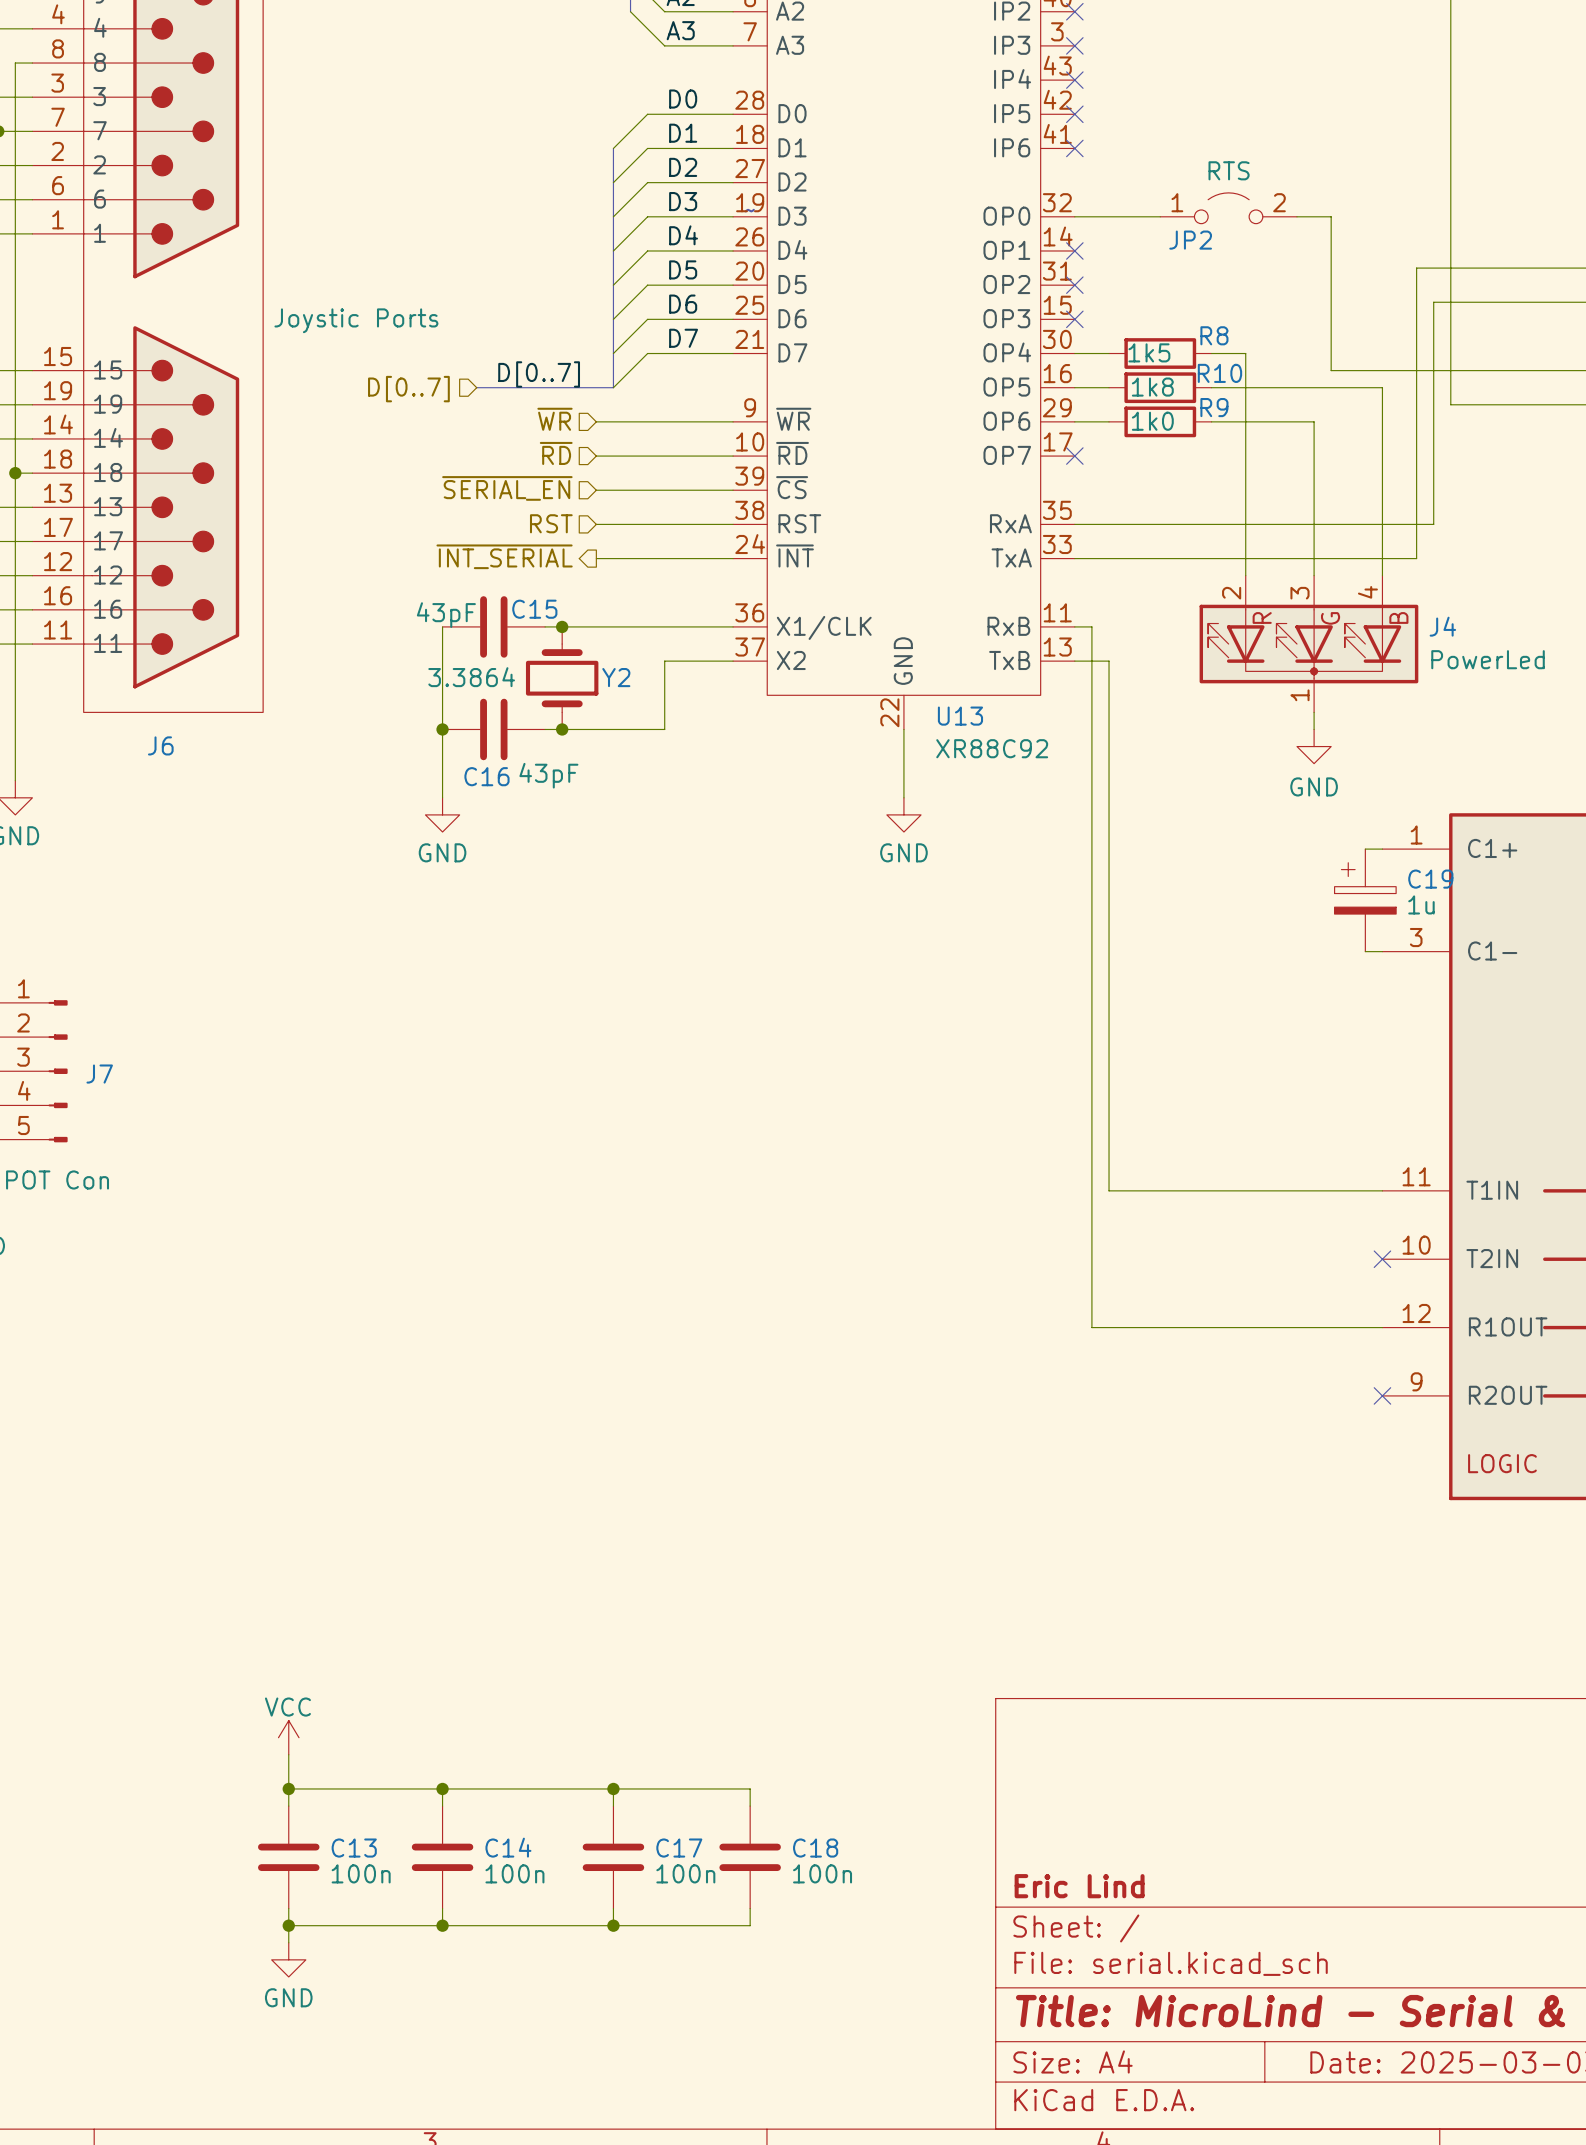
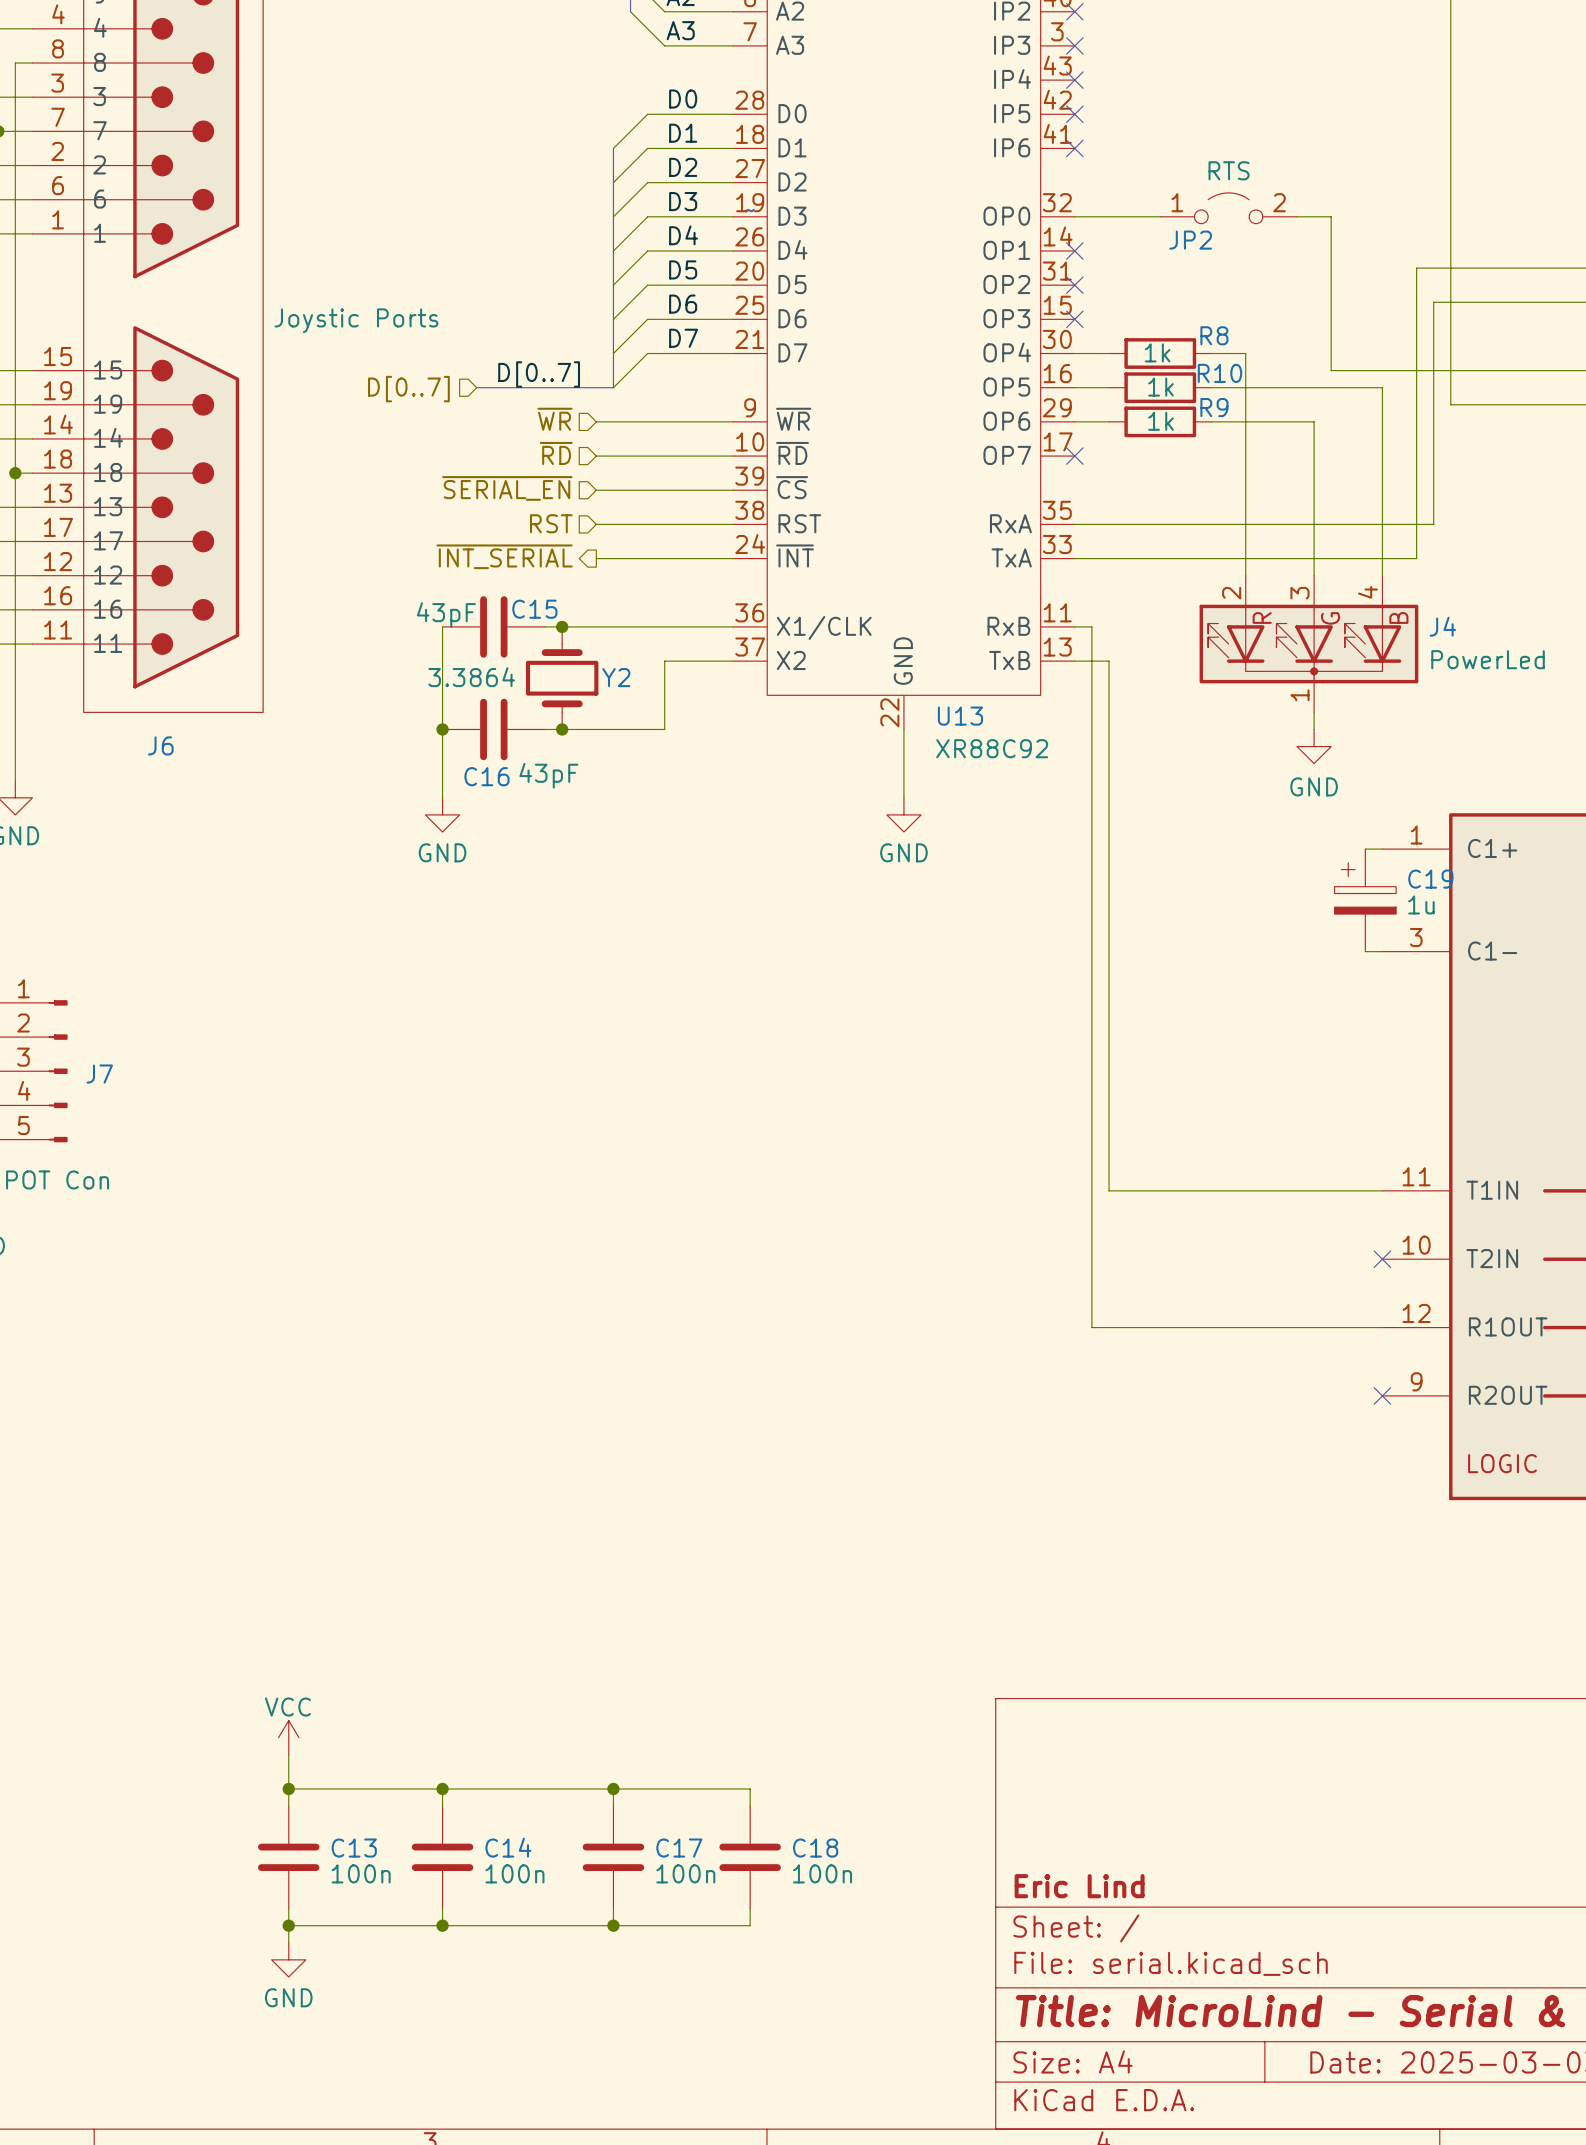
R8 value: 1k5 (1149, 352) -> 1k (1157, 352)
R10 value: 1k8 (1152, 387) -> 1k (1160, 387)
R9 value: 1k0 (1152, 421) -> 1k (1160, 421)

